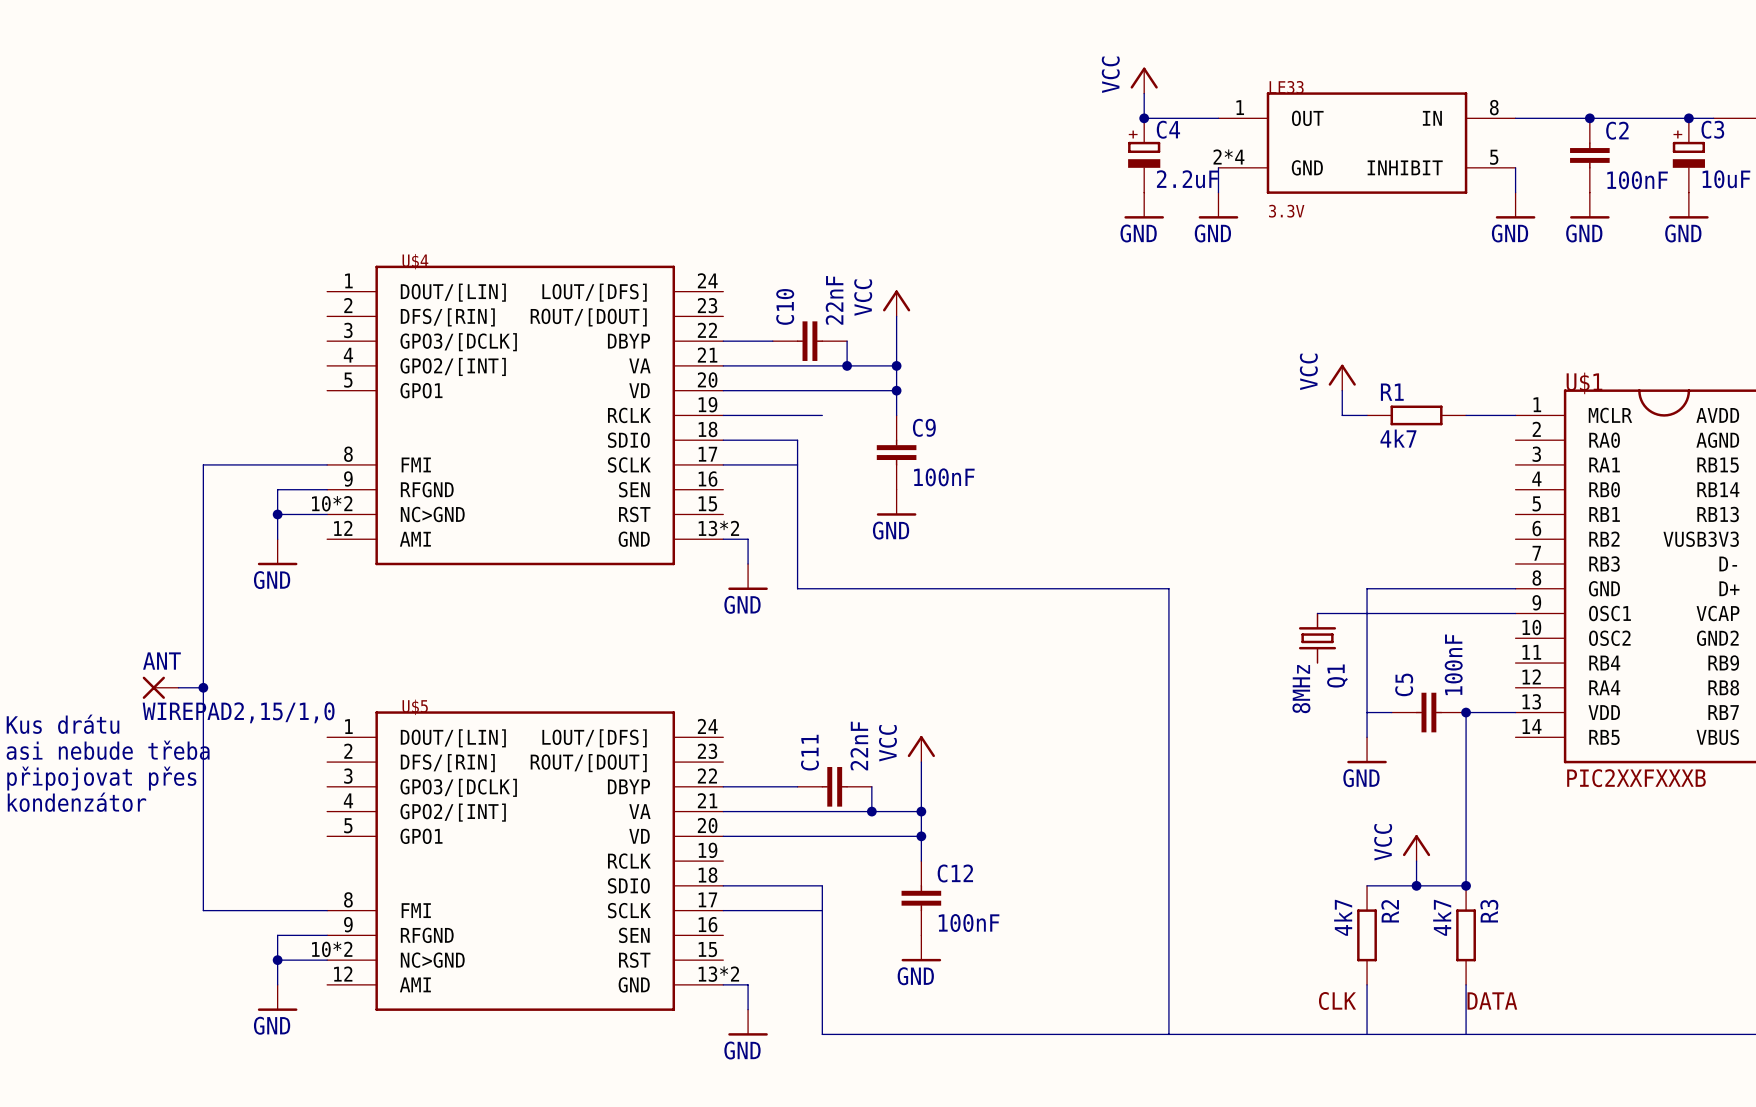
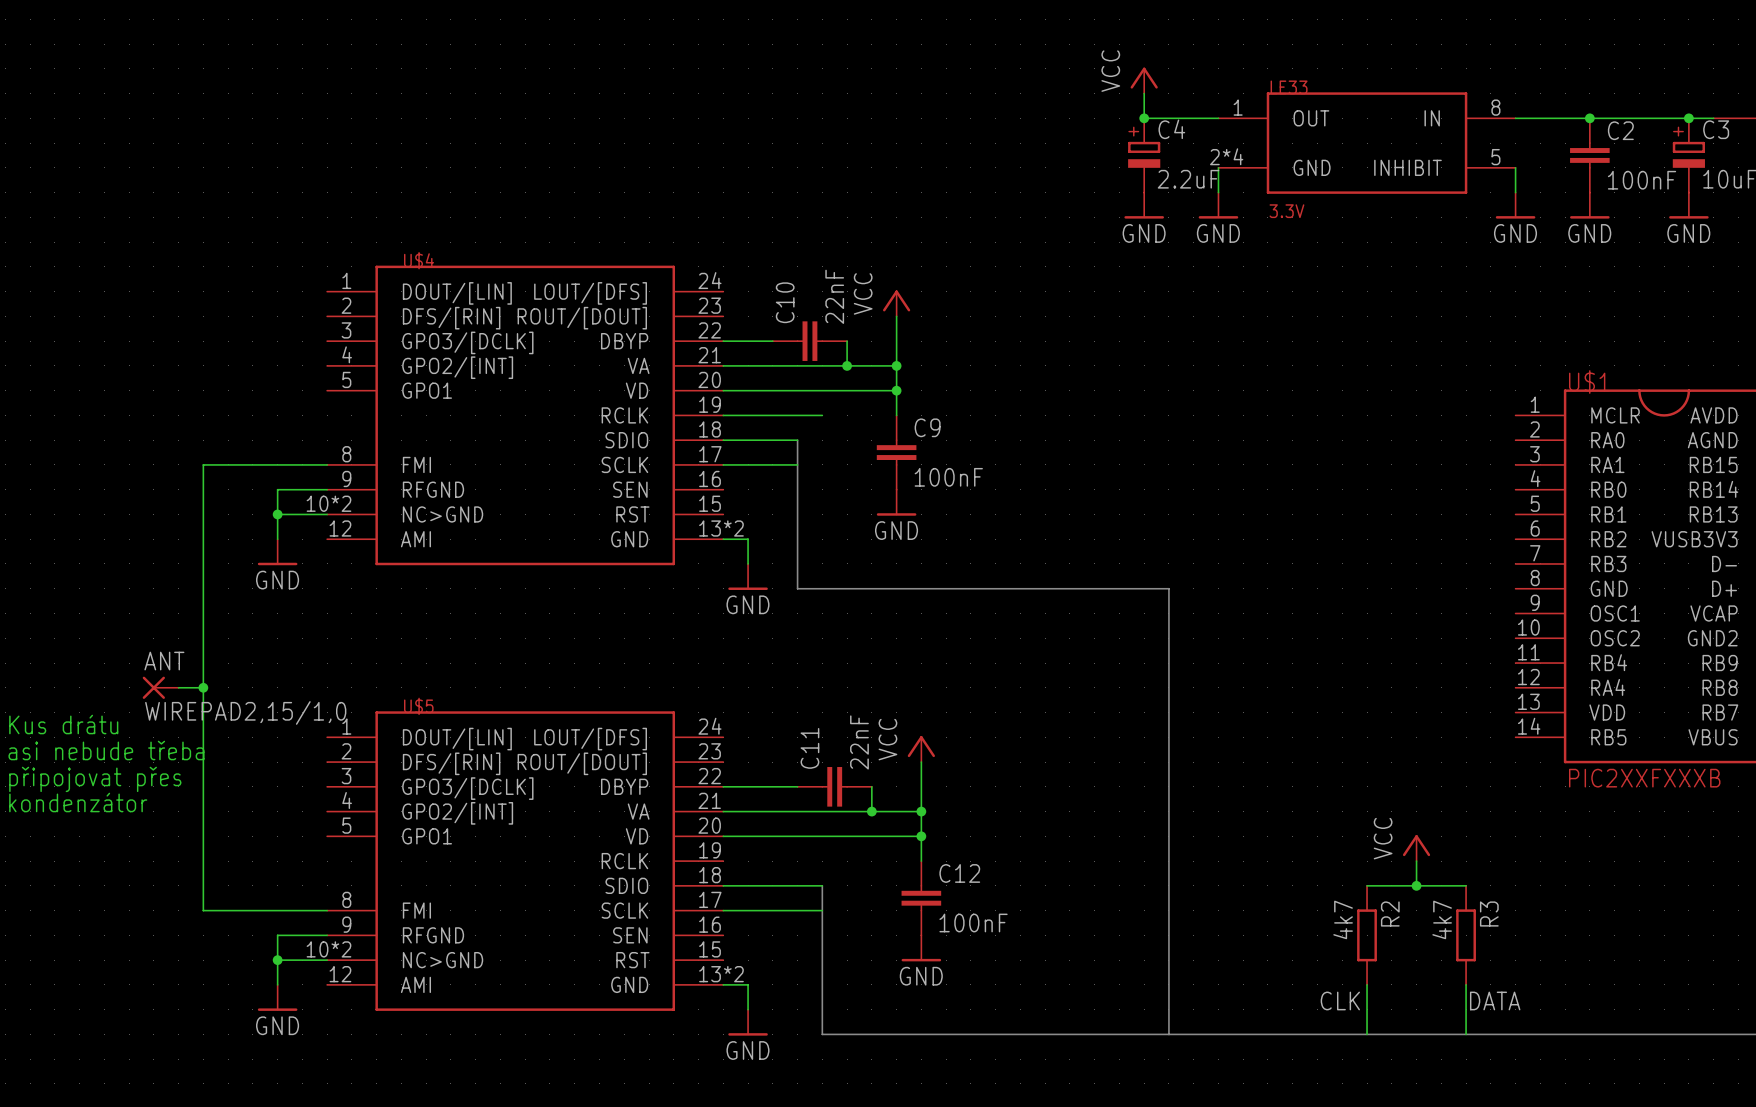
power symbol: VCC (1342, 377) -> none
wire: (1342, 390) (1342, 415) (1367, 415) -> none
R1: 4k7 (1416, 415) -> none
wire: (1466, 415) (1515, 415) -> none
wire: (1515, 588) (1367, 588) (1367, 737) -> none
wire: (1317, 613) (1515, 613) -> none
Q1: 8MHz (1317, 638) -> none
wire: (1367, 712) (1391, 712) -> none
C5: 100nF (1428, 712) -> none
junction: (1466, 712) -> none
wire: (1515, 712) (1466, 712) (1466, 885) -> none
power symbol: GND (1367, 750) -> none
junction: (1466, 885) -> none

